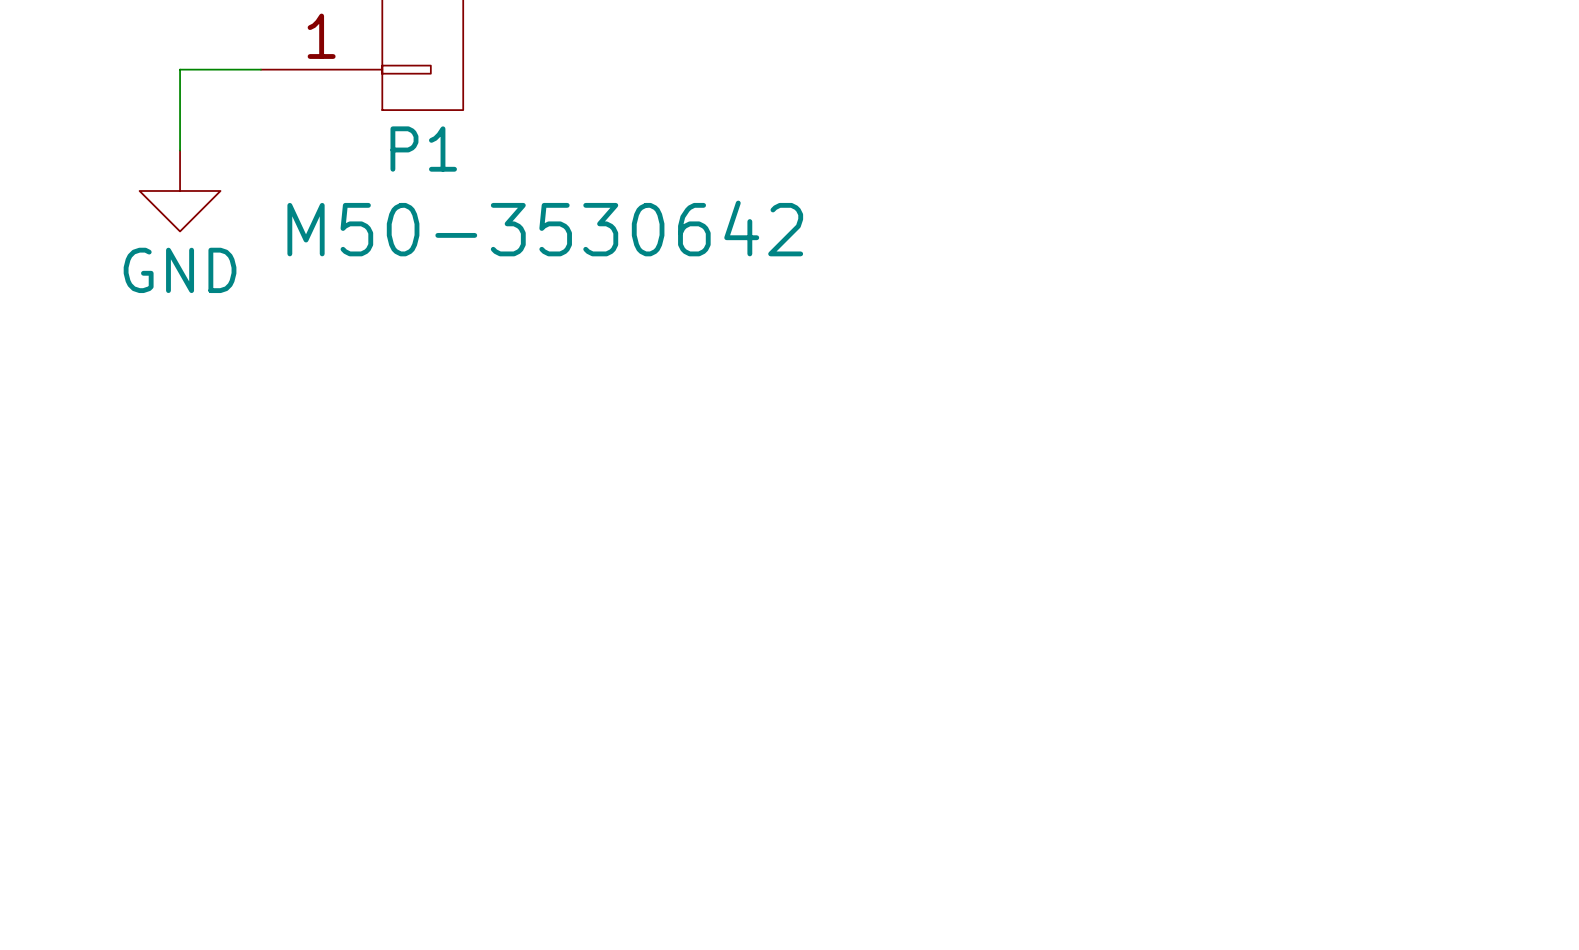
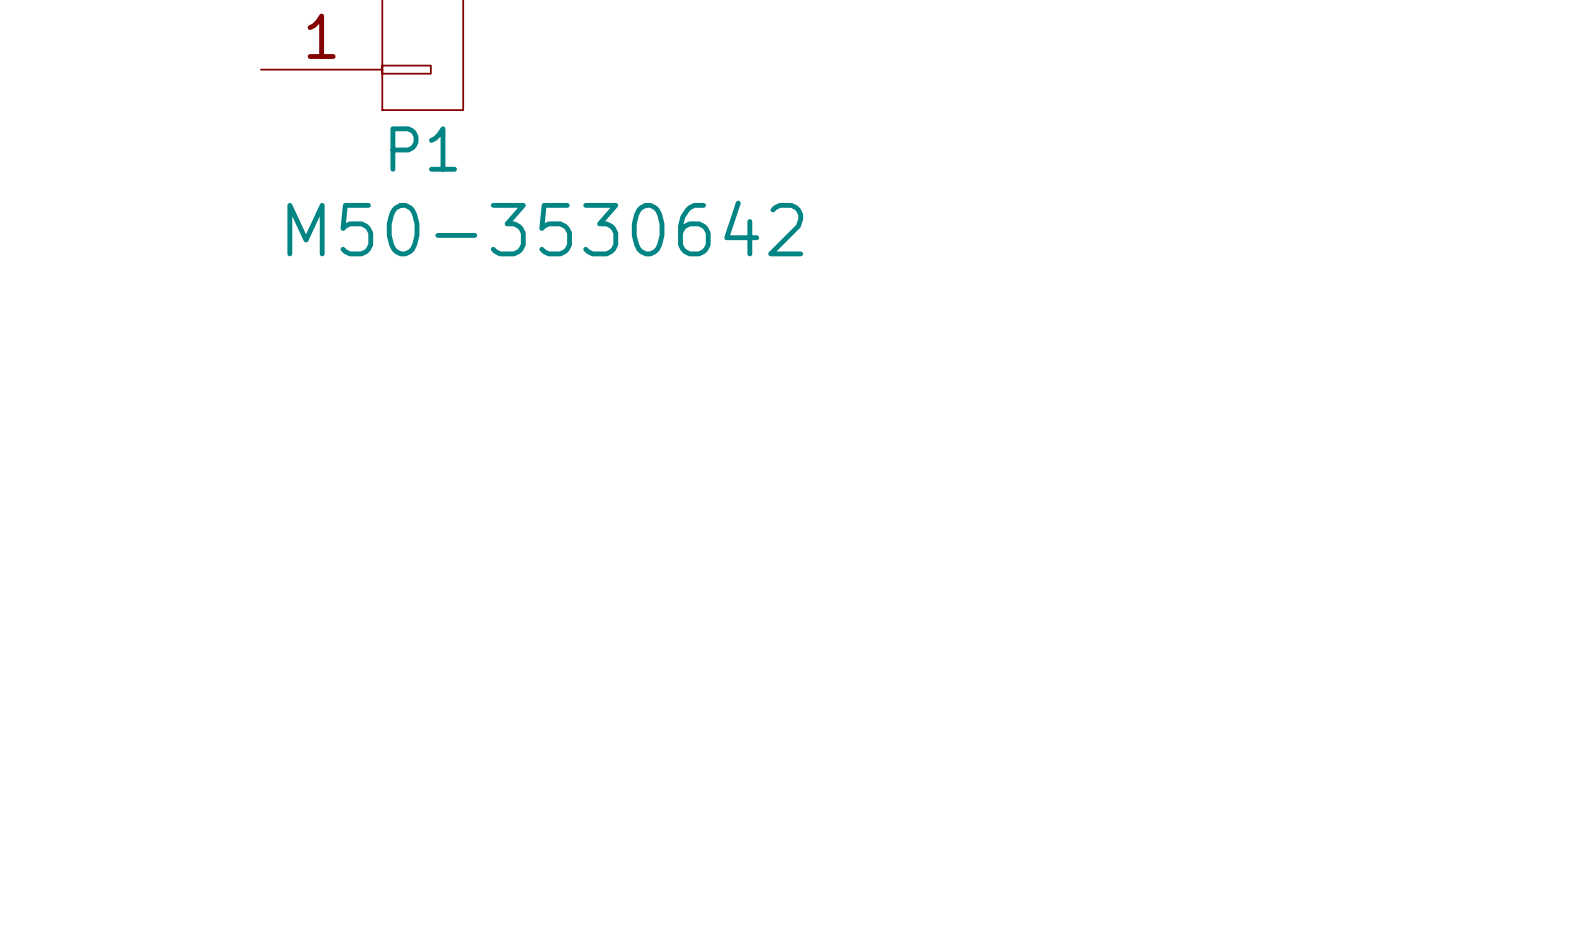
wire: (260, 69) (180, 69) (180, 150) -> none
power symbol: GND (180, 190) -> none

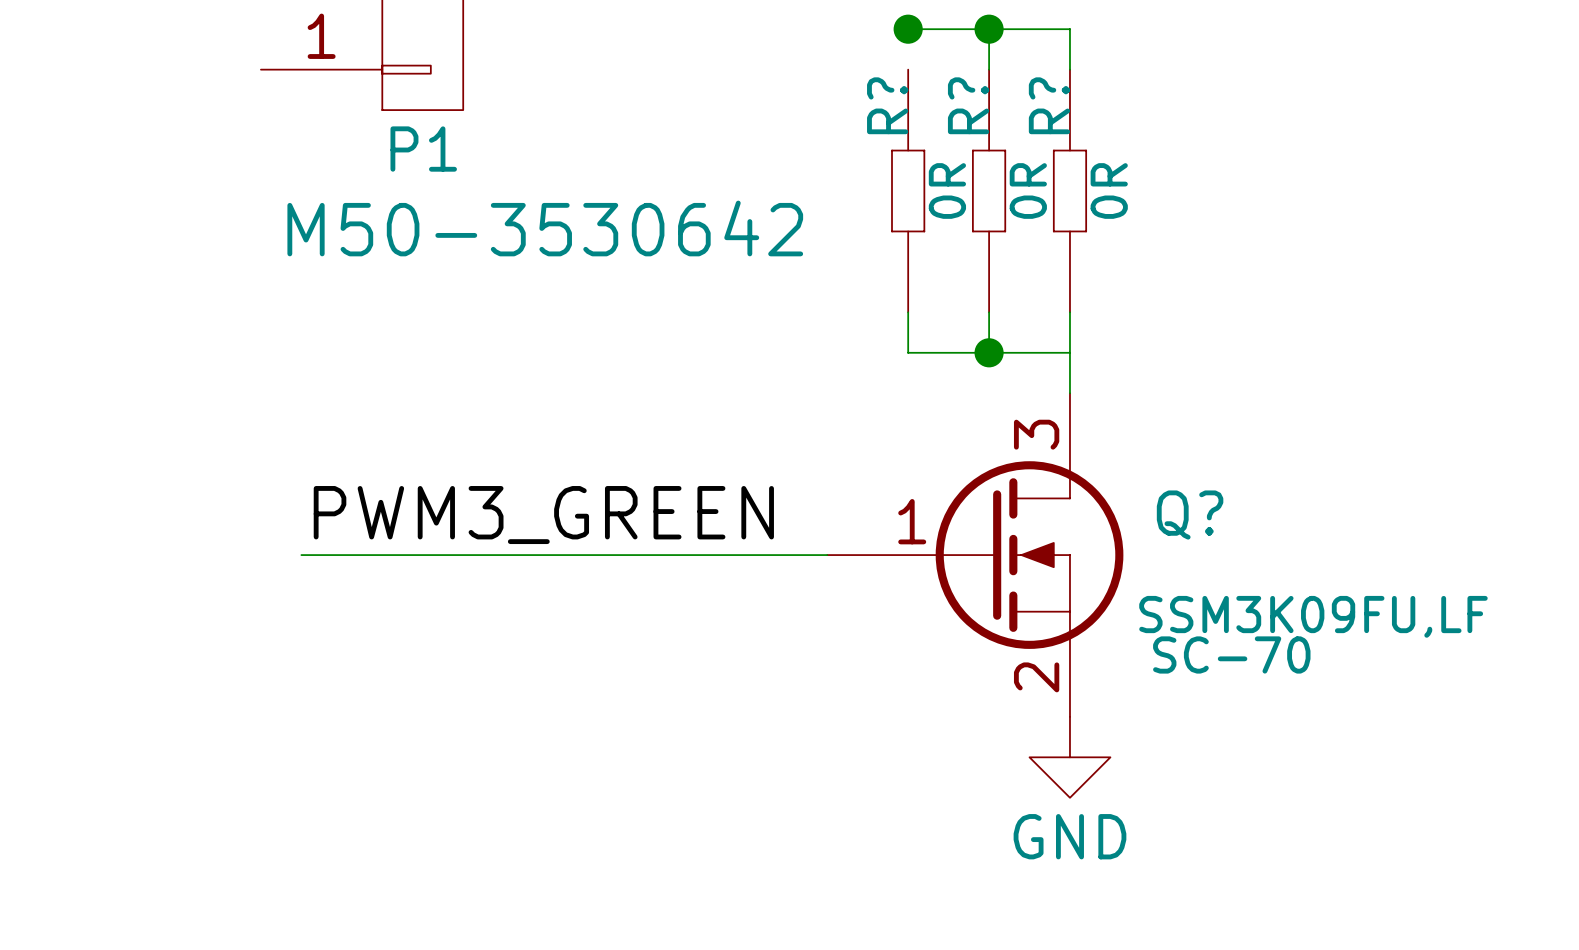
wire: none -> (908, 29) (1069, 29) (1069, 69)
junction: none -> (908, 29)
wire: none -> (989, 29) (989, 69)
junction: none -> (989, 29)
R?: none -> (908, 190)
R?: none -> (989, 190)
R?: none -> (1069, 190)
wire: none -> (908, 312) (908, 352) (1069, 352)
wire: none -> (989, 312) (989, 352)
wire: none -> (1069, 312) (1069, 393)
junction: none -> (989, 352)
label: none -> PWM3_GREEN (543, 515)
wire: none -> (301, 555) (827, 555)
Q?: none -> (975, 555)
power symbol: none -> GND (1069, 757)

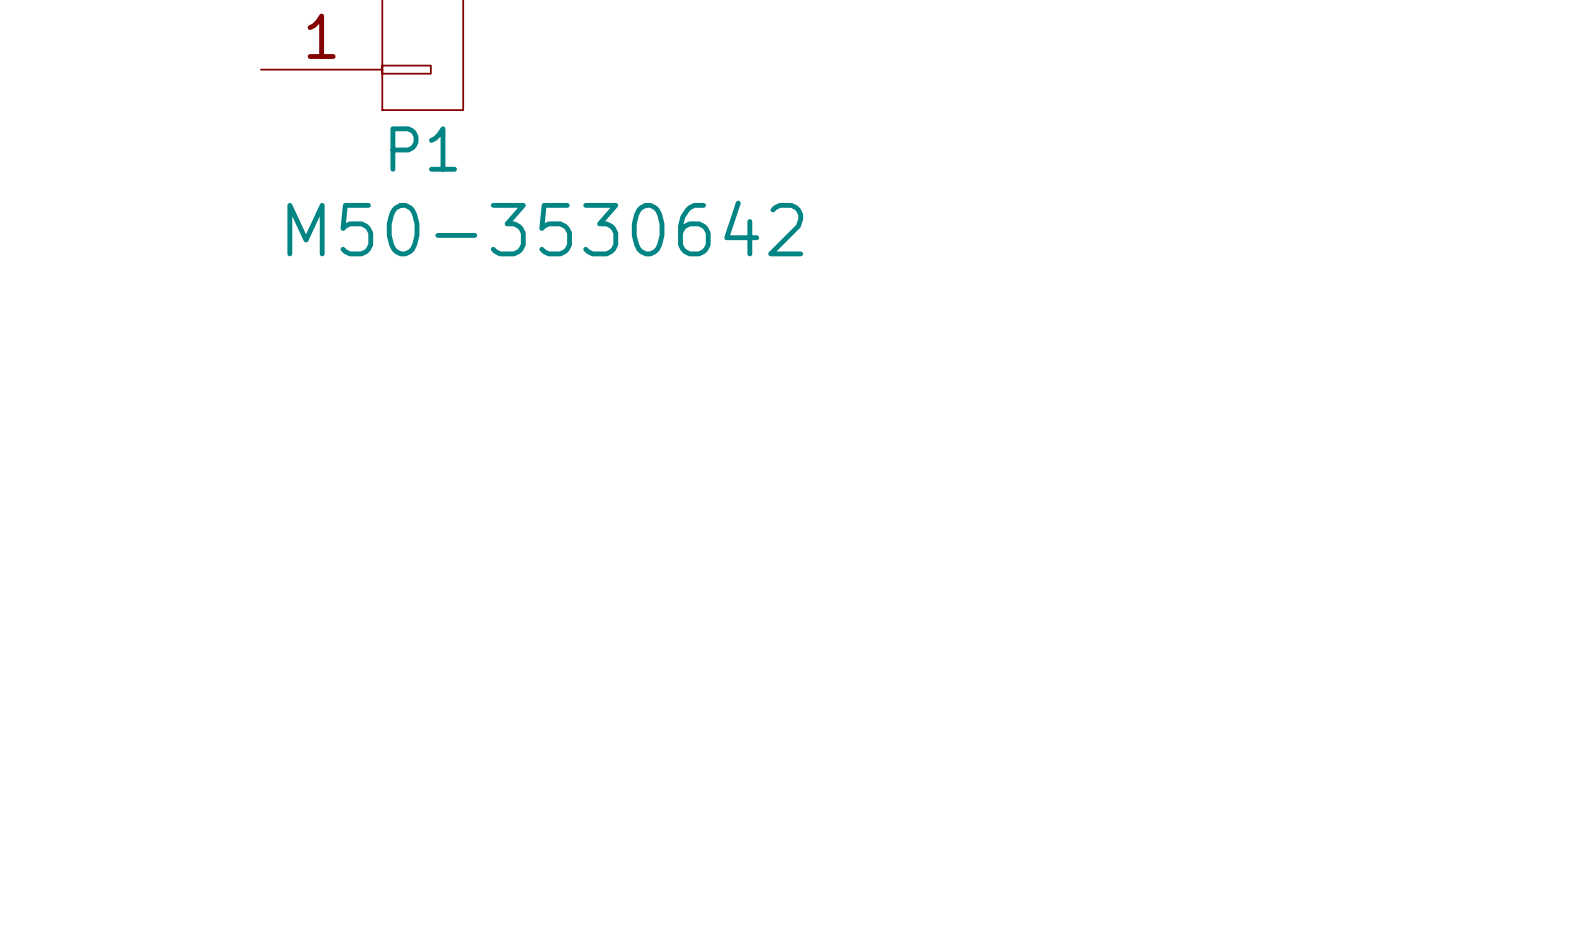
wire: (908, 29) (1069, 29) (1069, 69) -> none
junction: (908, 29) -> none
wire: (989, 29) (989, 69) -> none
junction: (989, 29) -> none
R?: (908, 190) -> none
R?: (989, 190) -> none
R?: (1069, 190) -> none
wire: (908, 312) (908, 352) (1069, 352) -> none
wire: (989, 312) (989, 352) -> none
wire: (1069, 312) (1069, 393) -> none
junction: (989, 352) -> none
label: PWM3_GREEN (543, 515) -> none
wire: (301, 555) (827, 555) -> none
Q?: (975, 555) -> none
power symbol: GND (1069, 757) -> none

